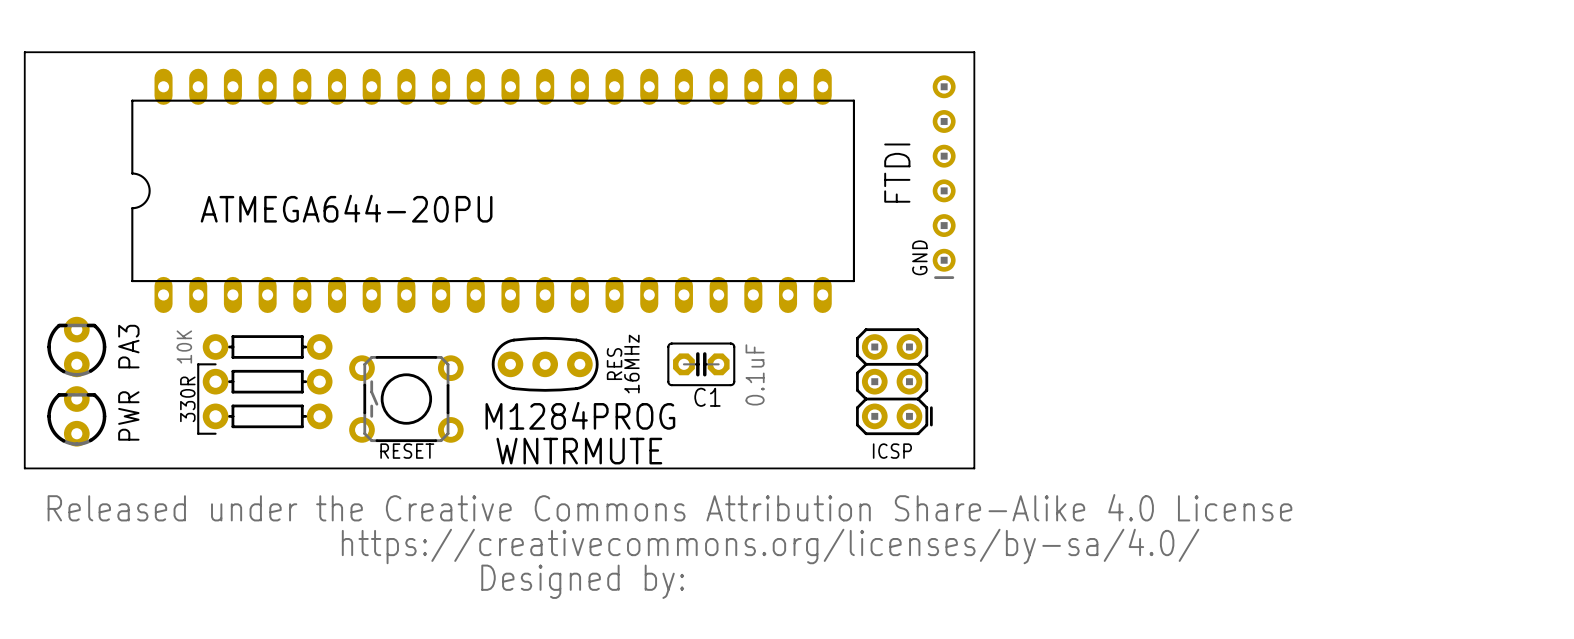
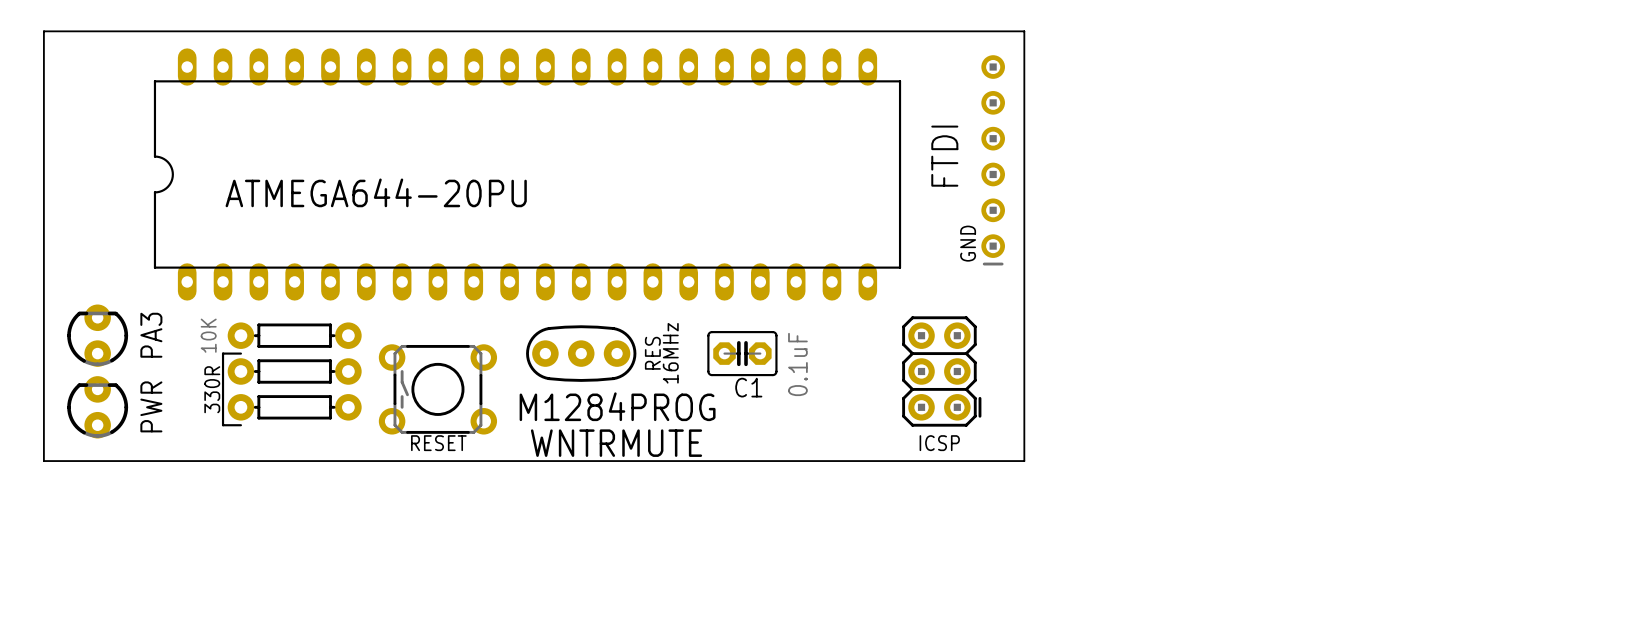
drawing: [47, 494, 1293, 599] -> none

